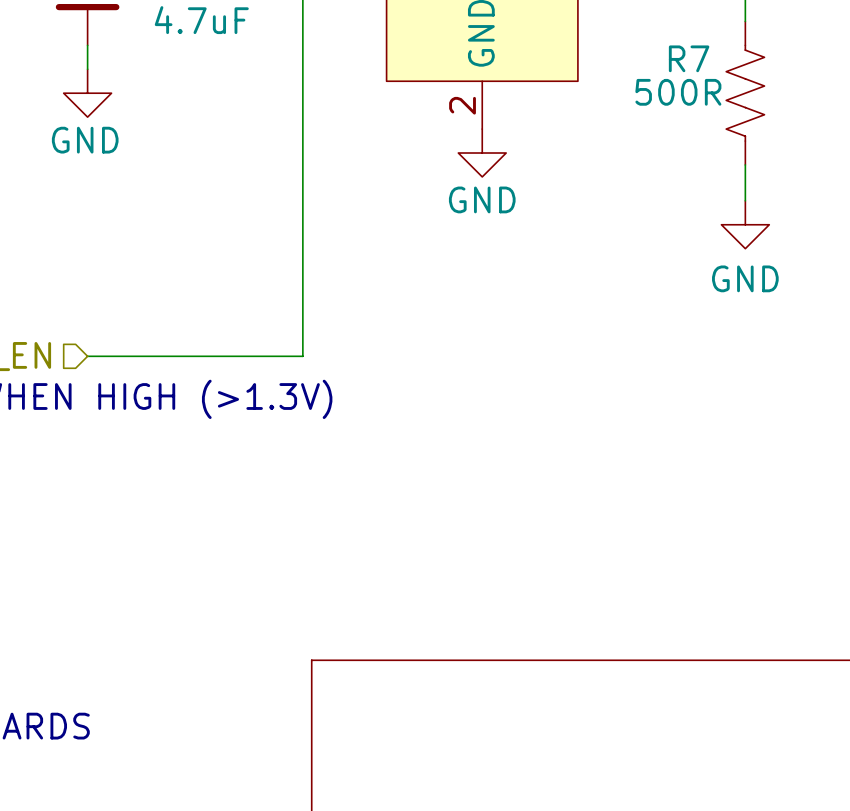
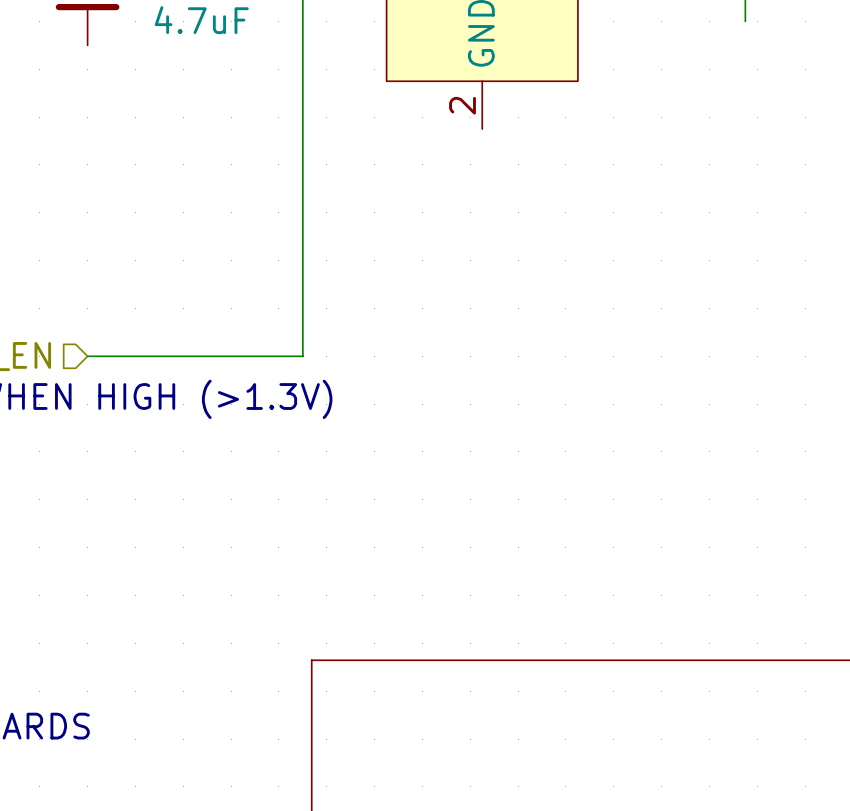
wire: (87, 45) (87, 69) -> none
power symbol: GND (87, 93) -> none
R7: 500R (745, 93) -> none
power symbol: GND (482, 153) -> none
wire: (745, 164) (745, 200) -> none
power symbol: GND (745, 224) -> none

